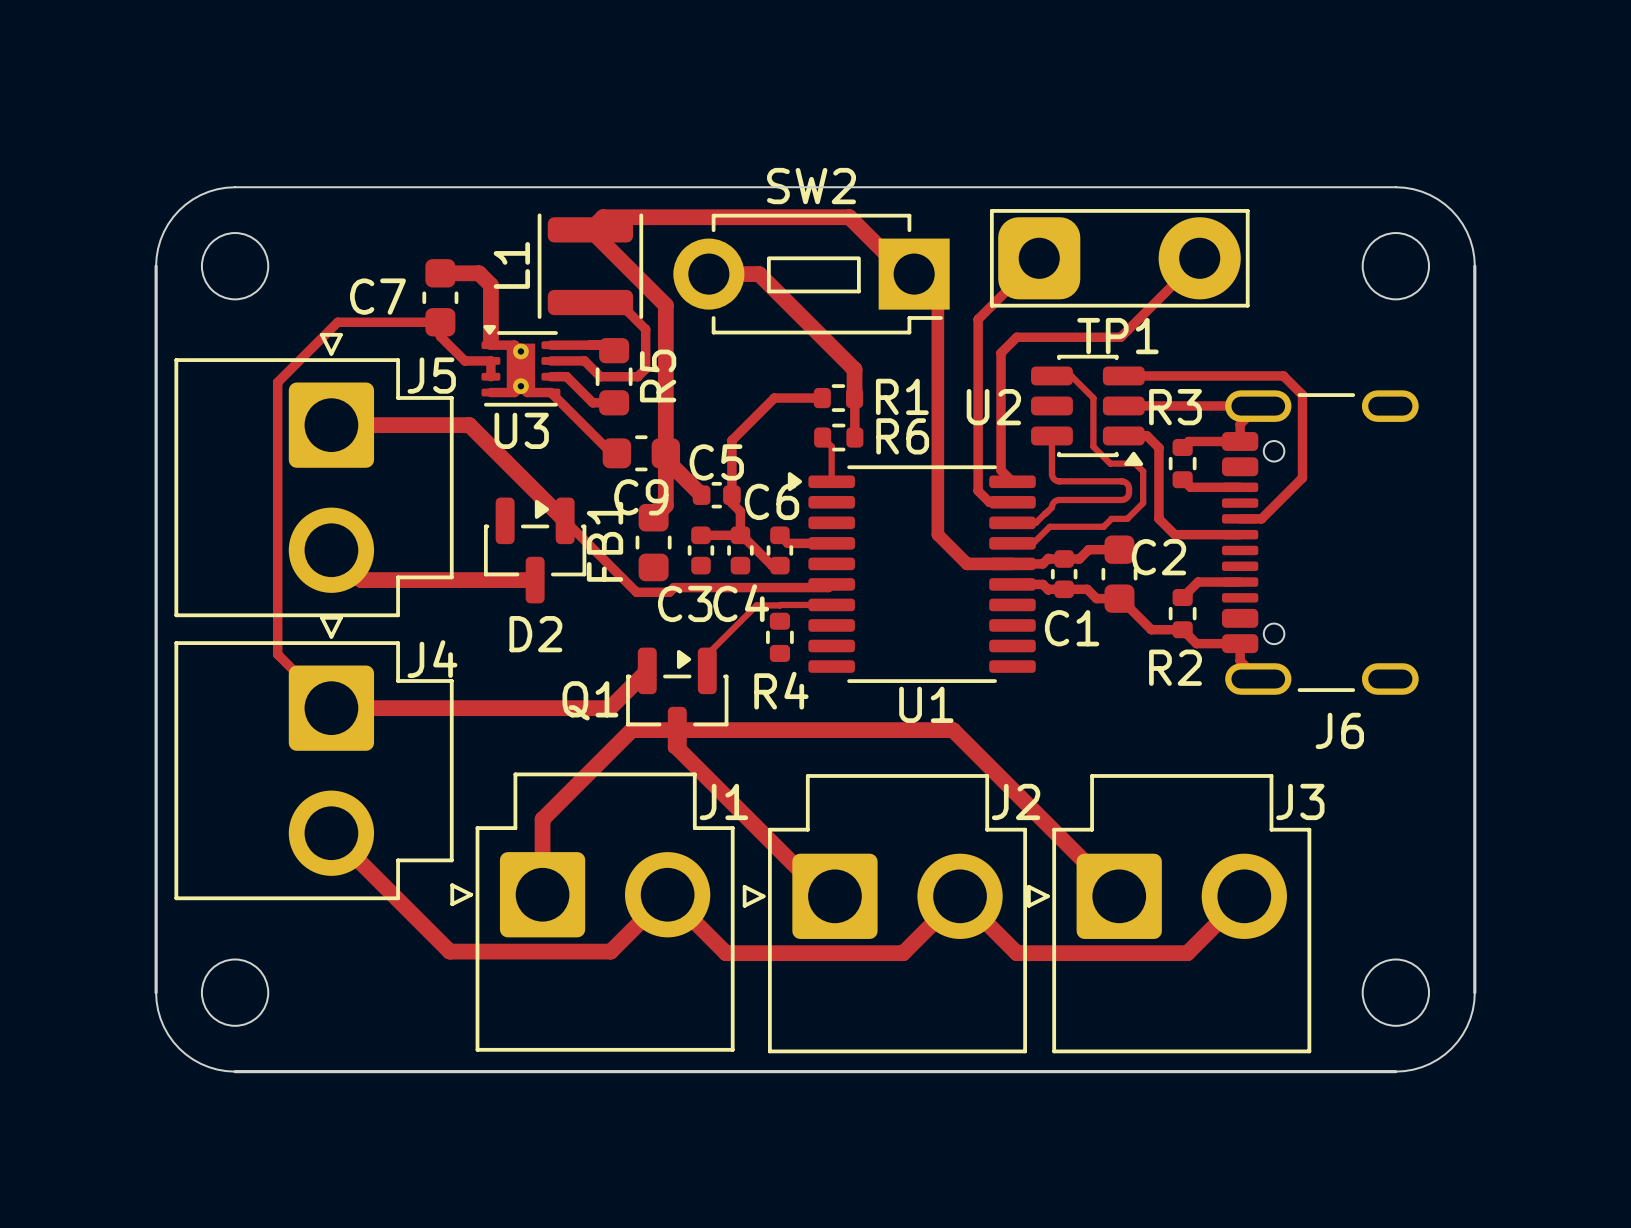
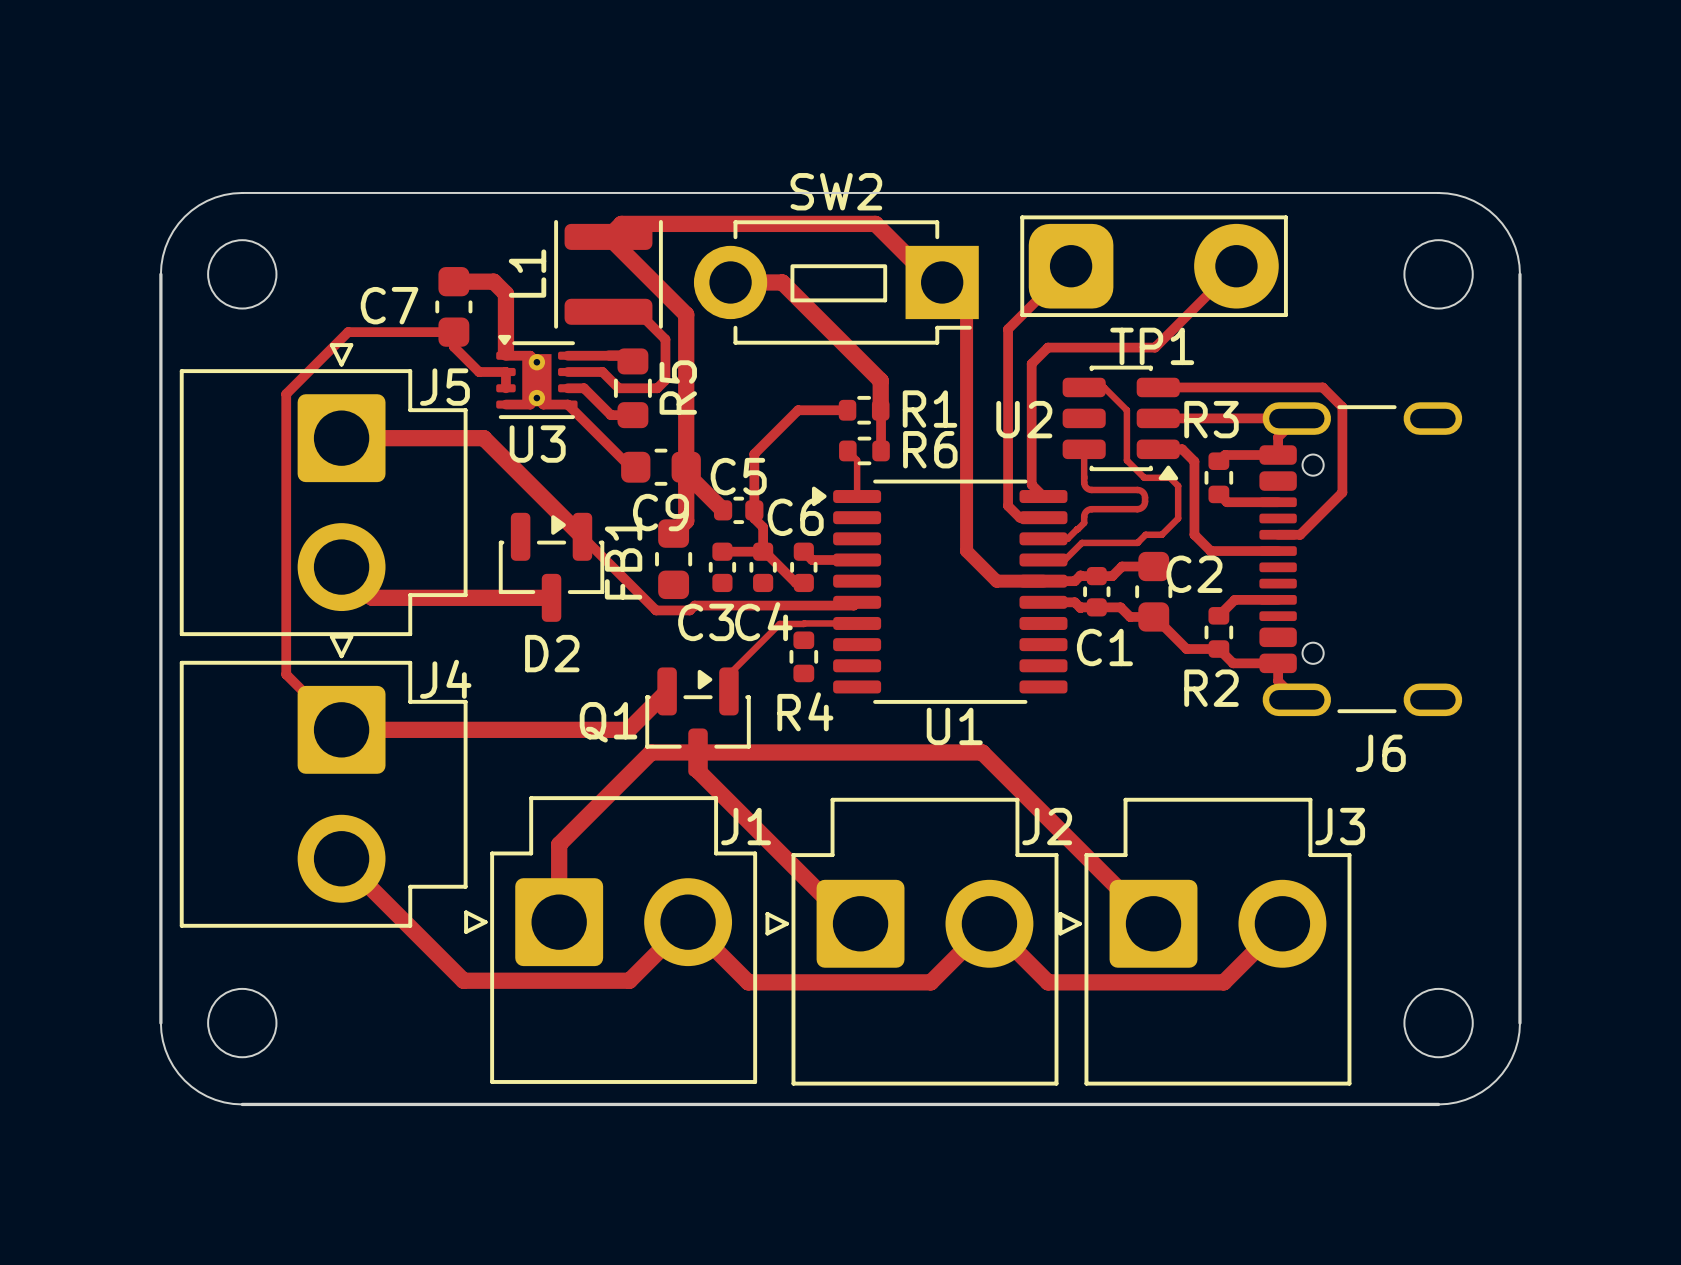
track: (1051, 467) (1052, 476) (1057, 481) (1122, 481) (1127, 484) (1129, 488) (1128, 496) (1123, 499) (1058, 500) (1054, 502) (1051, 507) -> (1084, 482) (1085, 486) (1089, 489) (1138, 490) (1142, 492) (1145, 497) (1144, 505) (1139, 508) (1088, 509) (1084, 513) (1084, 522)

